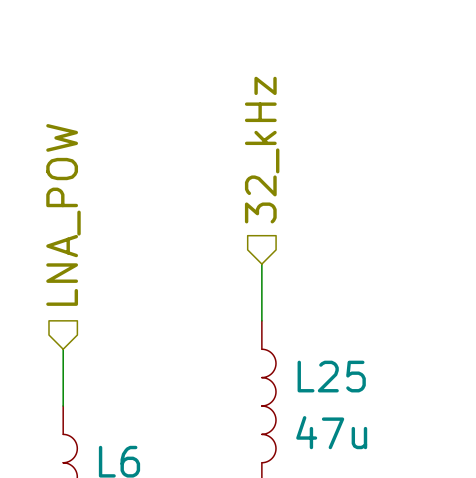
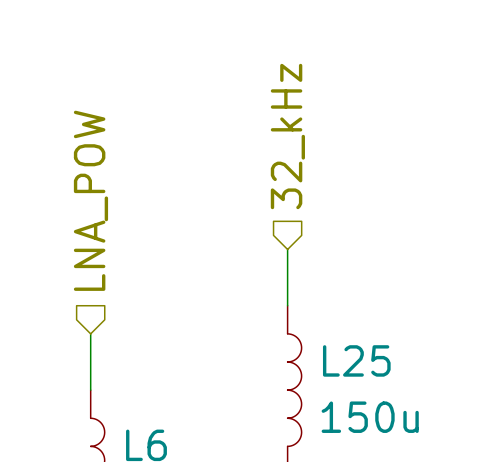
L25 value: 47u (331, 432) -> 150u (370, 417)

